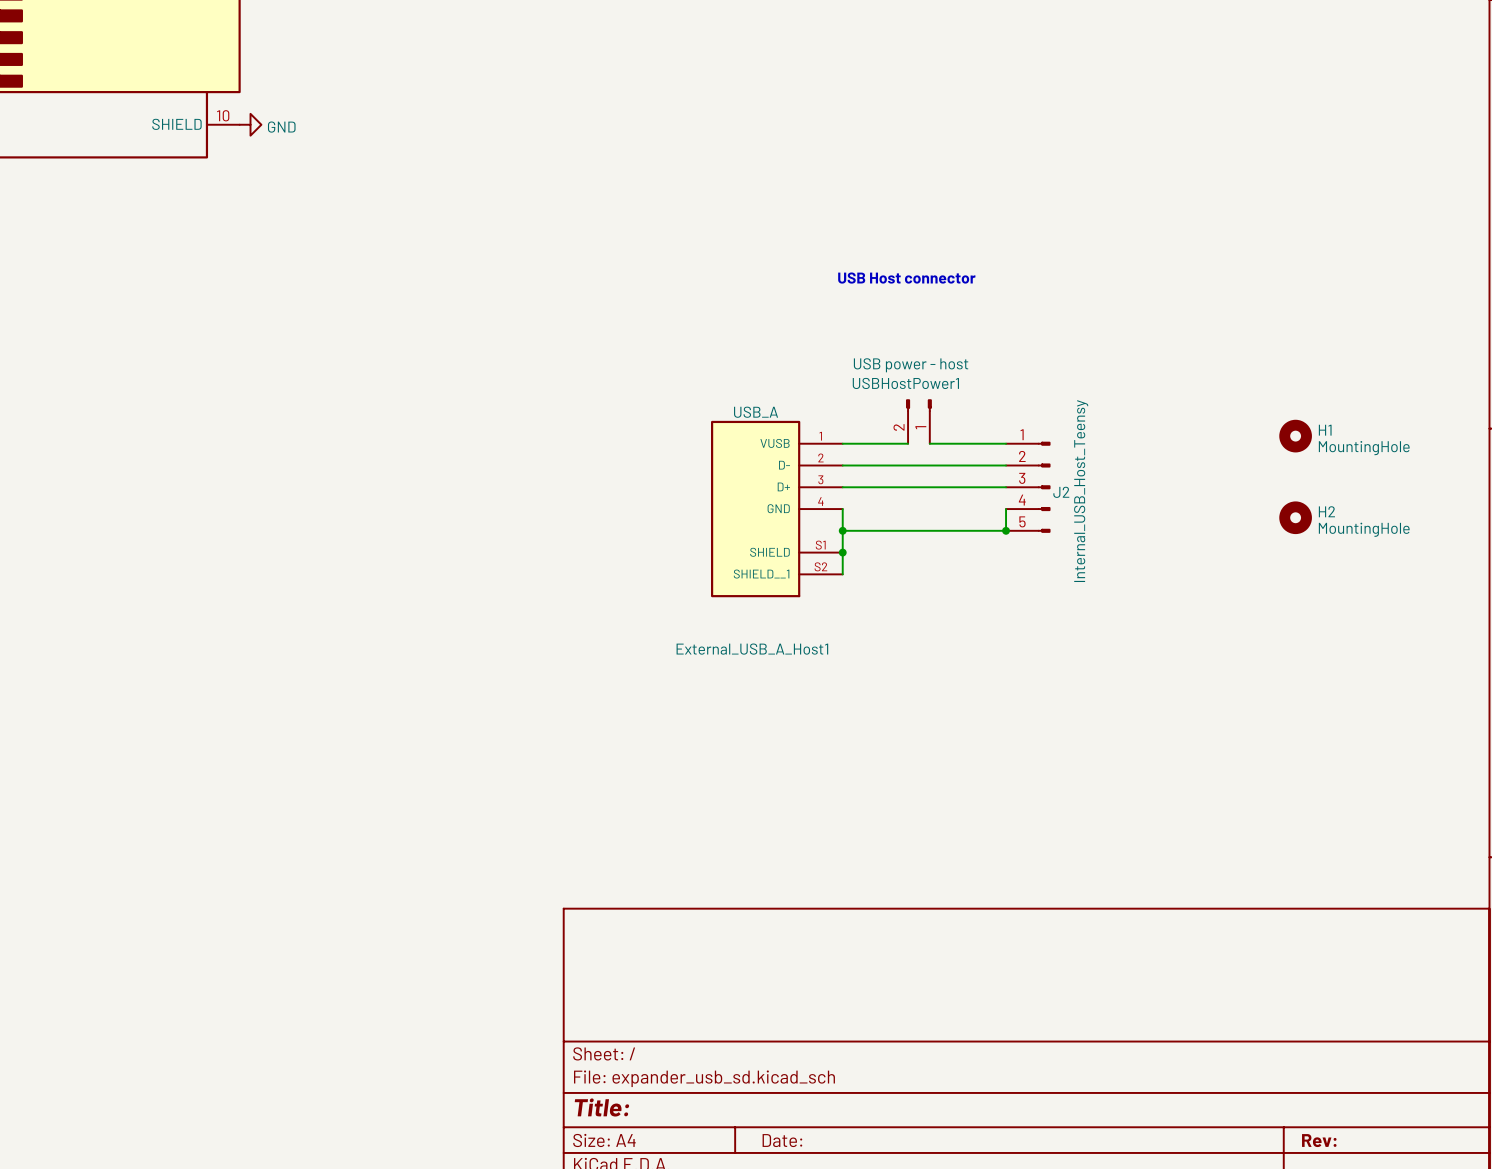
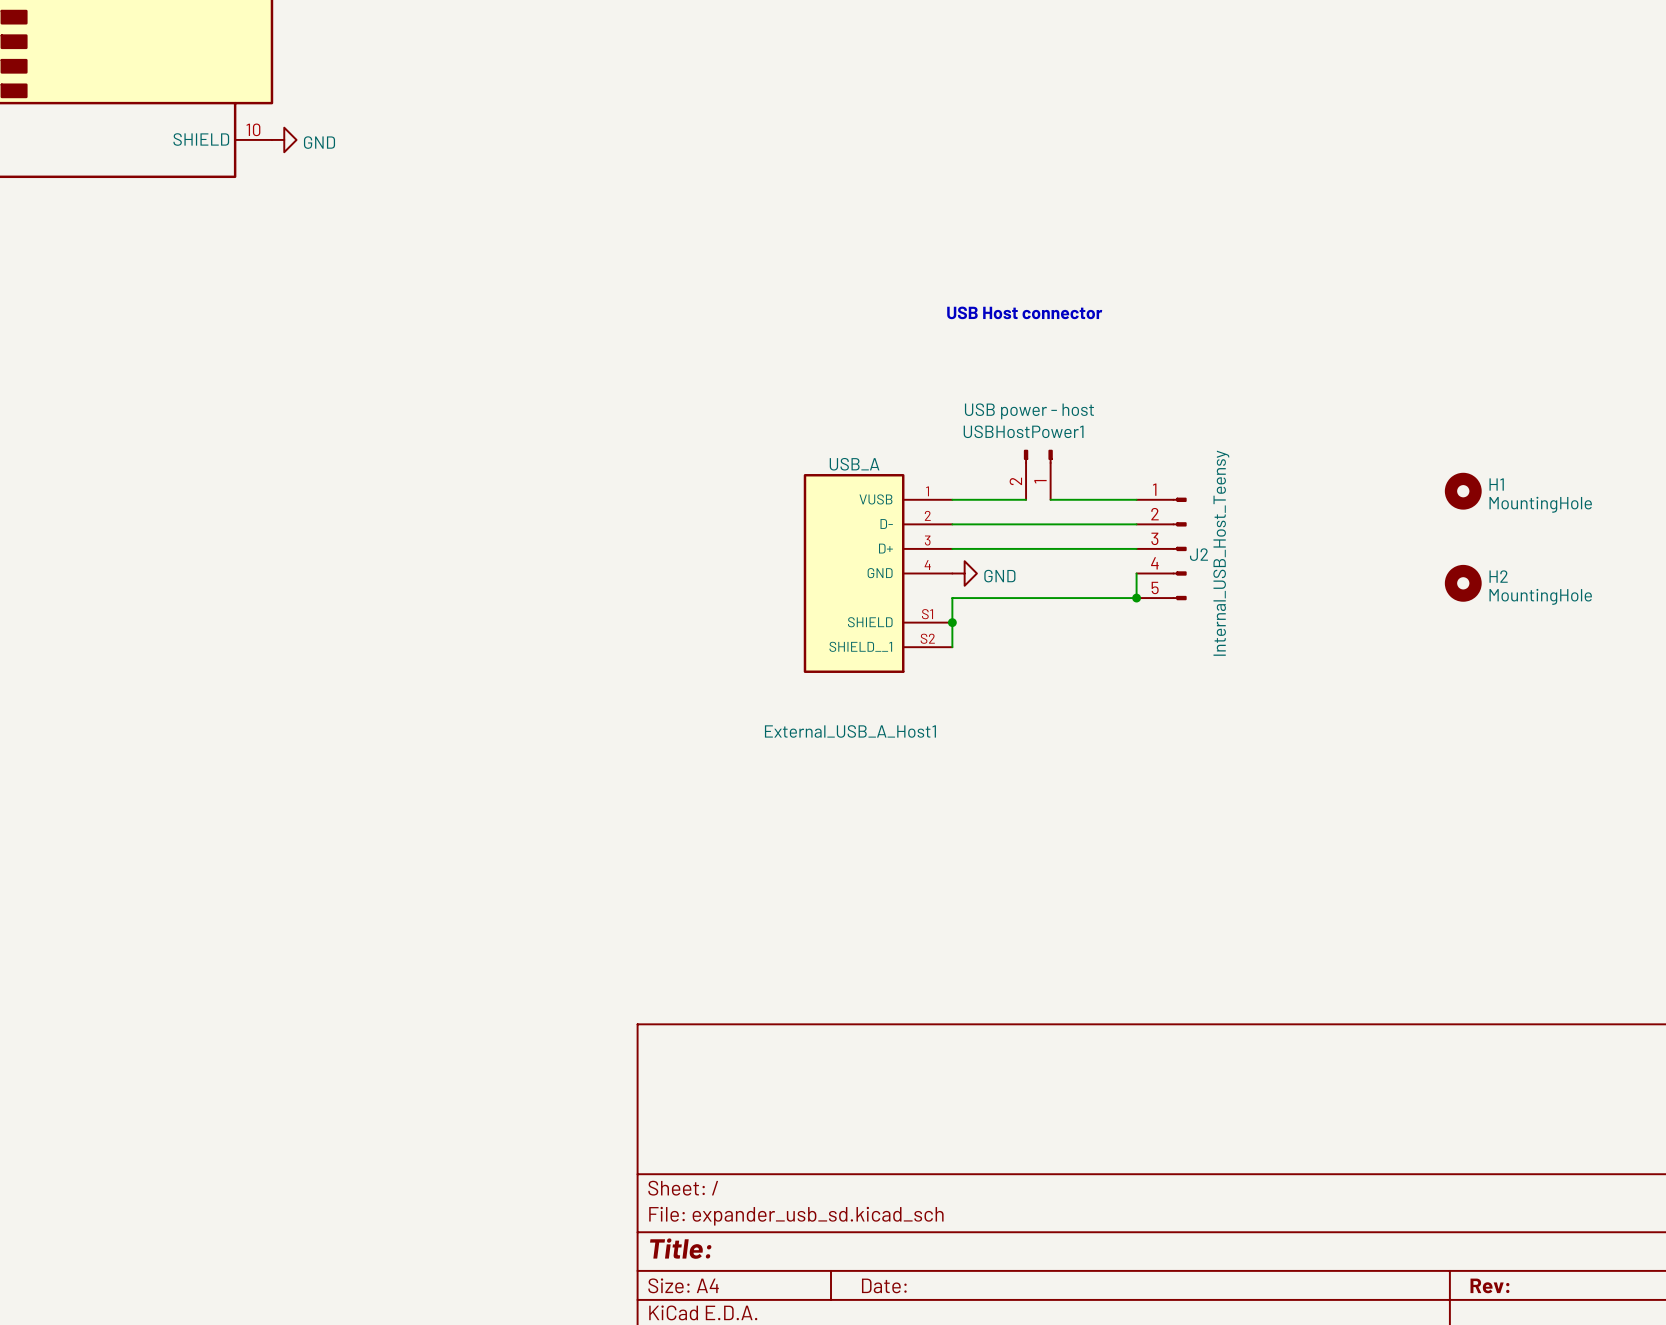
wire: (842, 509) (842, 530) -> none
power symbol: none -> GND (964, 573)
junction: (842, 530) -> none

